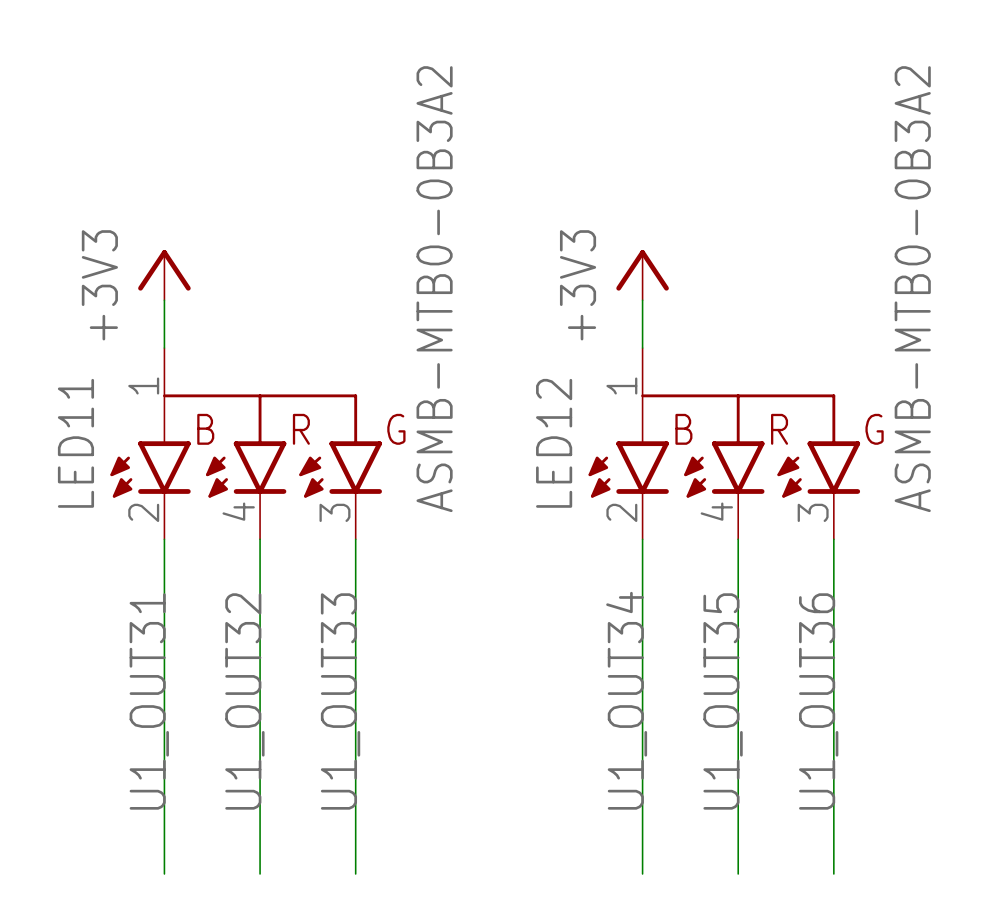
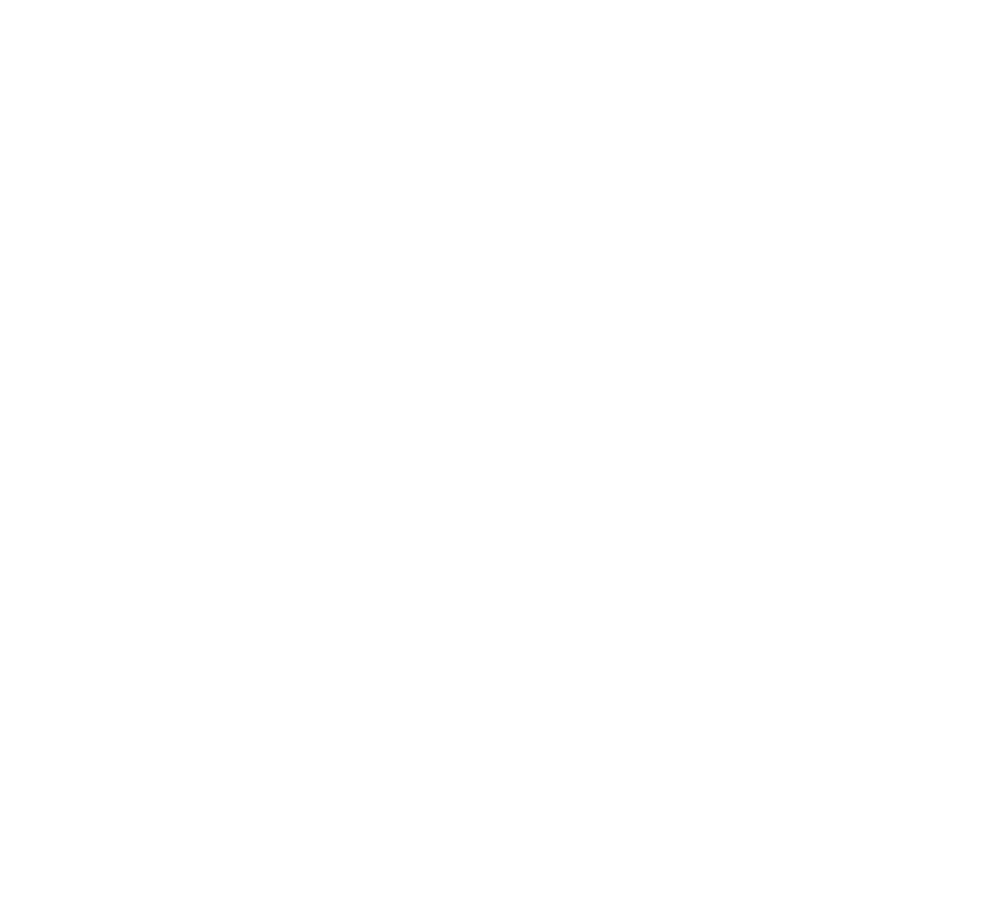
power symbol: +3V3 (164, 275) -> none
power symbol: +3V3 (642, 275) -> none
wire: (164, 300) (164, 348) -> none
wire: (642, 300) (642, 348) -> none
LED11: ASMB-MTB0-0B3A2 (246, 443) -> none
LED12: ASMB-MTB0-0B3A2 (724, 443) -> none
wire: (164, 539) (164, 874) -> none
wire: (260, 539) (260, 874) -> none
wire: (355, 539) (355, 874) -> none
wire: (642, 539) (642, 874) -> none
wire: (738, 539) (738, 874) -> none
wire: (833, 539) (833, 874) -> none
label: U1_OUT34 (626, 700) -> none
label: U1_OUT31 (149, 701) -> none
label: U1_OUT32 (244, 701) -> none
label: U1_OUT33 (340, 701) -> none
label: U1_OUT35 (723, 701) -> none
label: U1_OUT36 (818, 701) -> none

